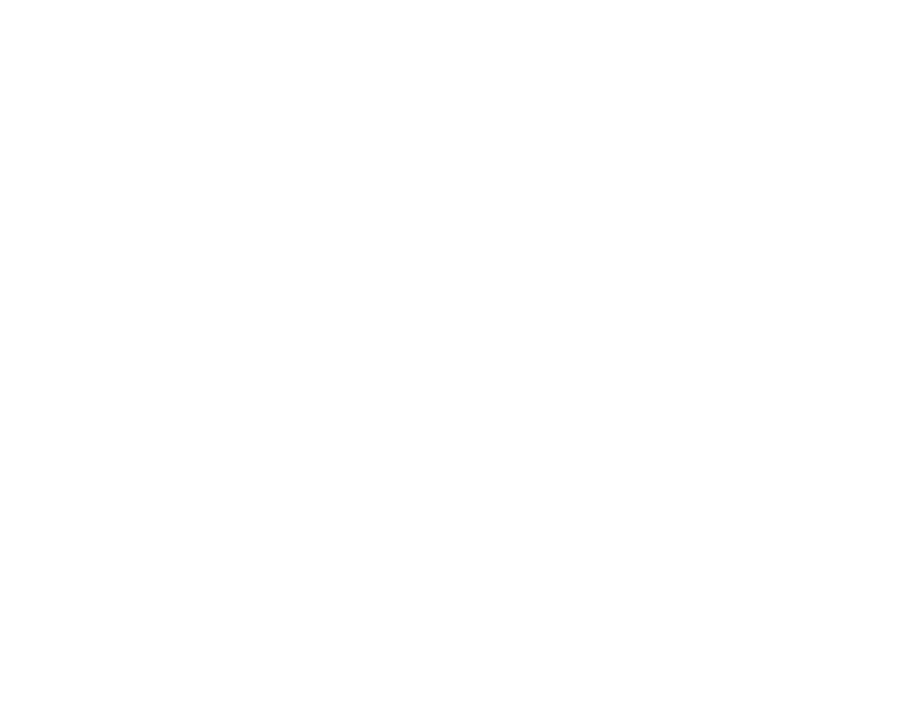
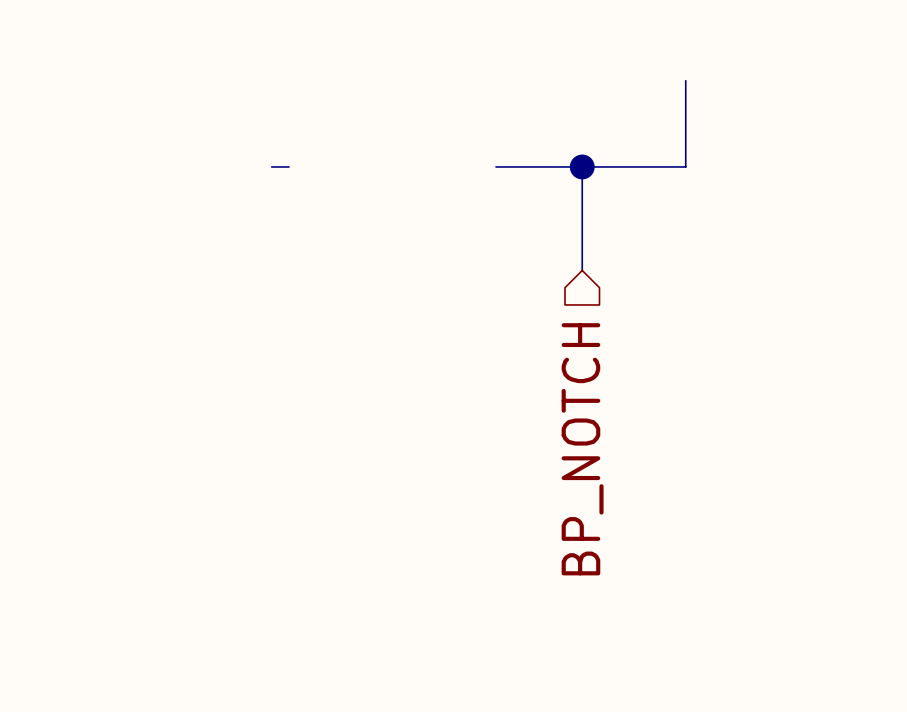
wire: none -> (685, 80) (685, 166) (495, 166)
wire: none -> (271, 166) (288, 166)
wire: none -> (582, 166) (582, 270)
junction: none -> (582, 166)
hierarchical label: none -> BP_NOTCH (582, 449)

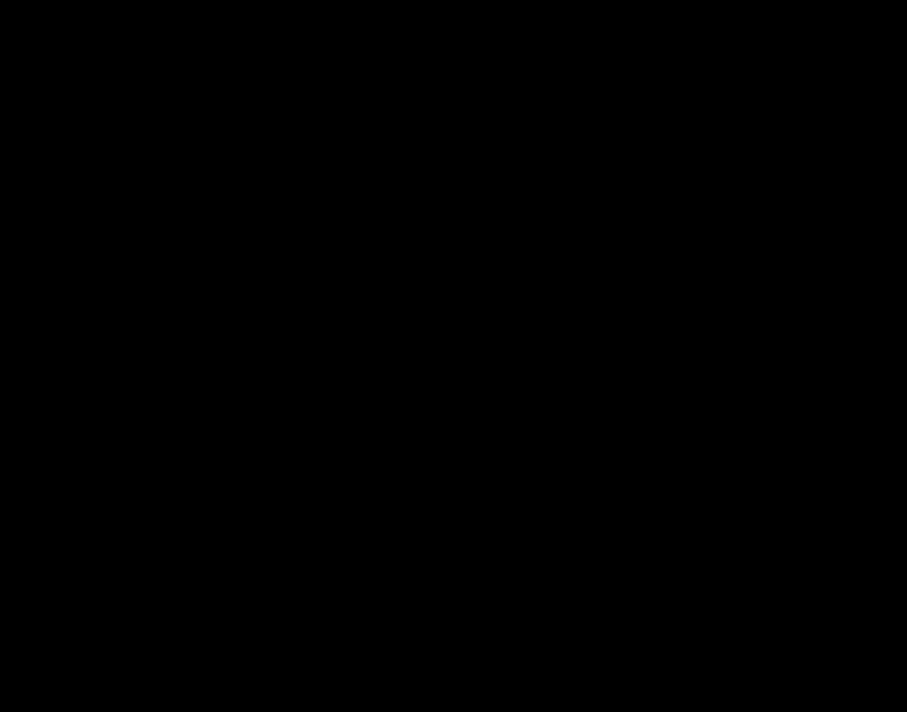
wire: (685, 80) (685, 166) (495, 166) -> none
wire: (271, 166) (288, 166) -> none
wire: (582, 166) (582, 270) -> none
junction: (582, 166) -> none
hierarchical label: BP_NOTCH (582, 449) -> none

